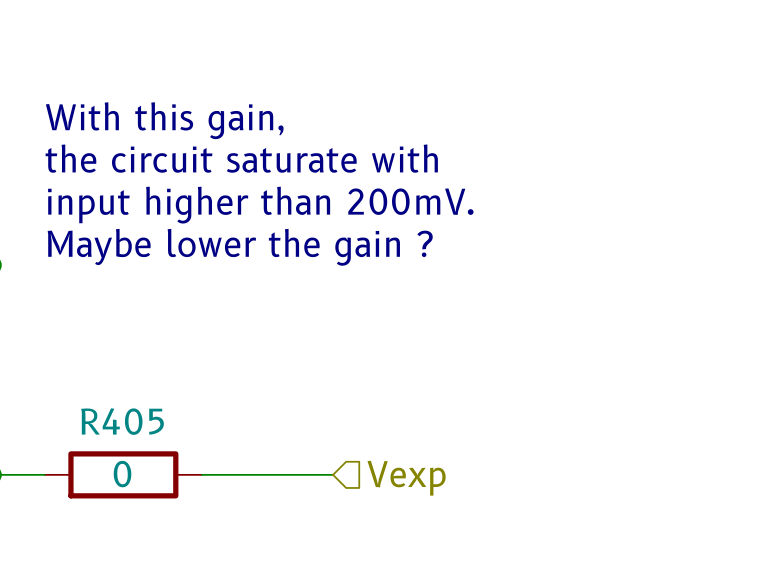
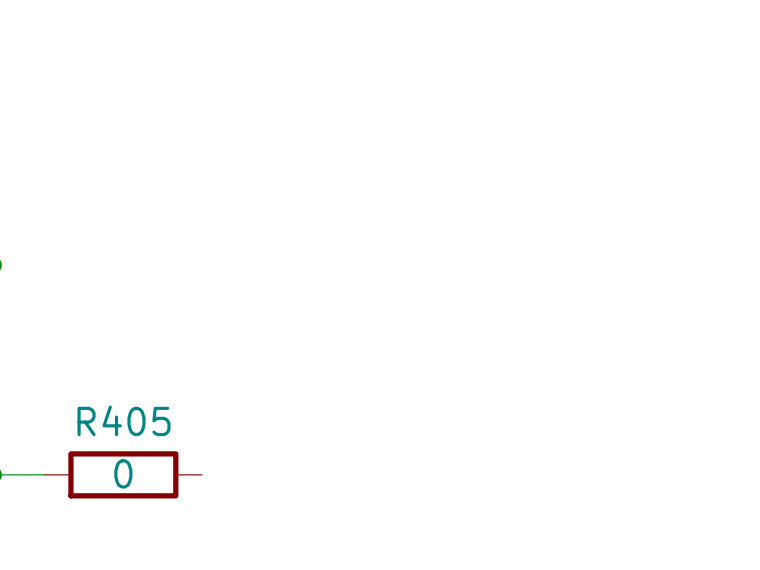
text: With this gain, (164, 120) -> none
text: the circuit saturate with (241, 158) -> none
text: input higher than 200mV. (260, 205) -> none
text: Maybe lower the gain ? (240, 247) -> none
wire: (202, 474) (333, 474) -> none
hierarchical label: Vexp (406, 478) -> none

